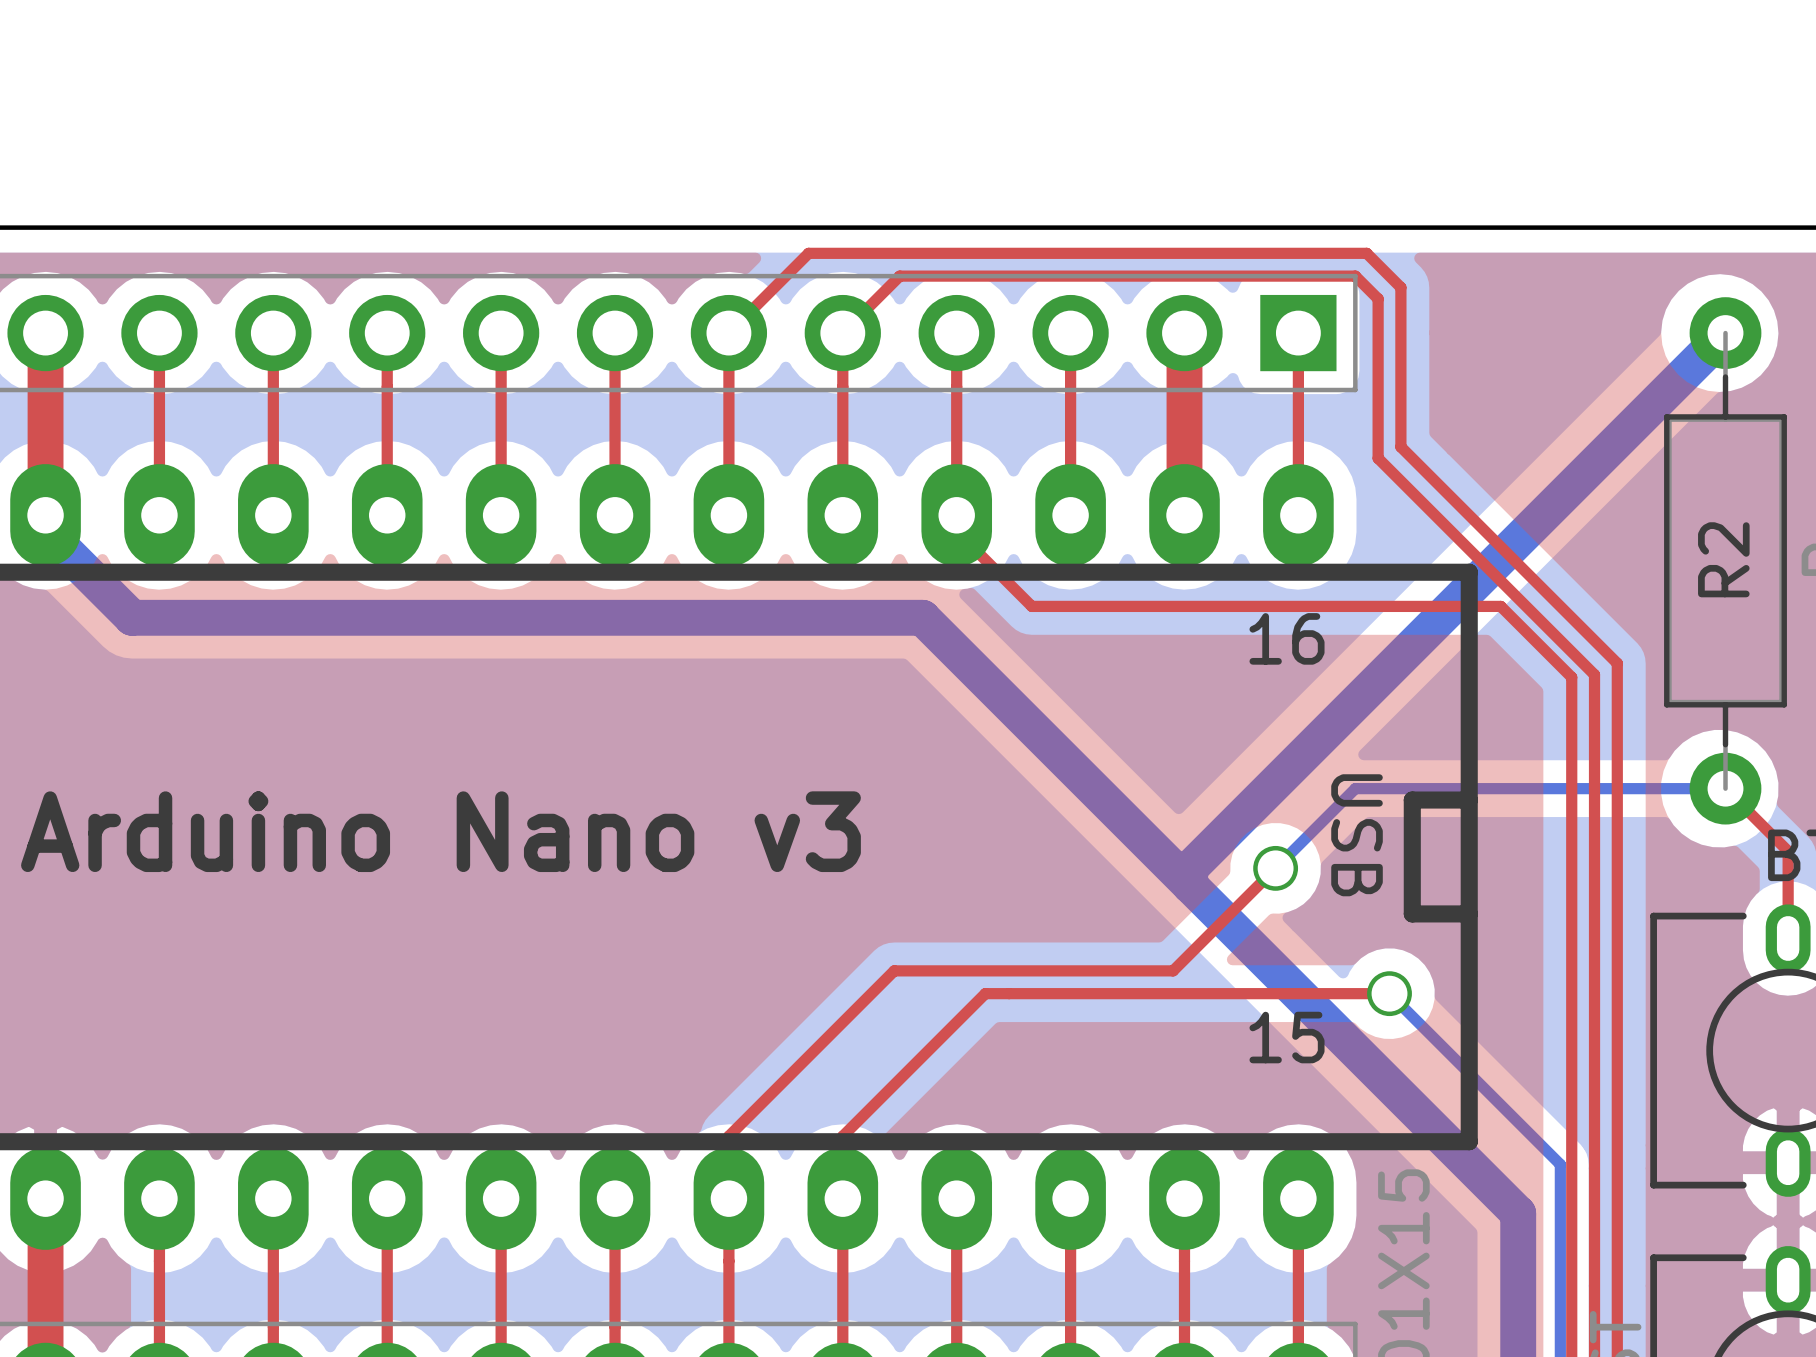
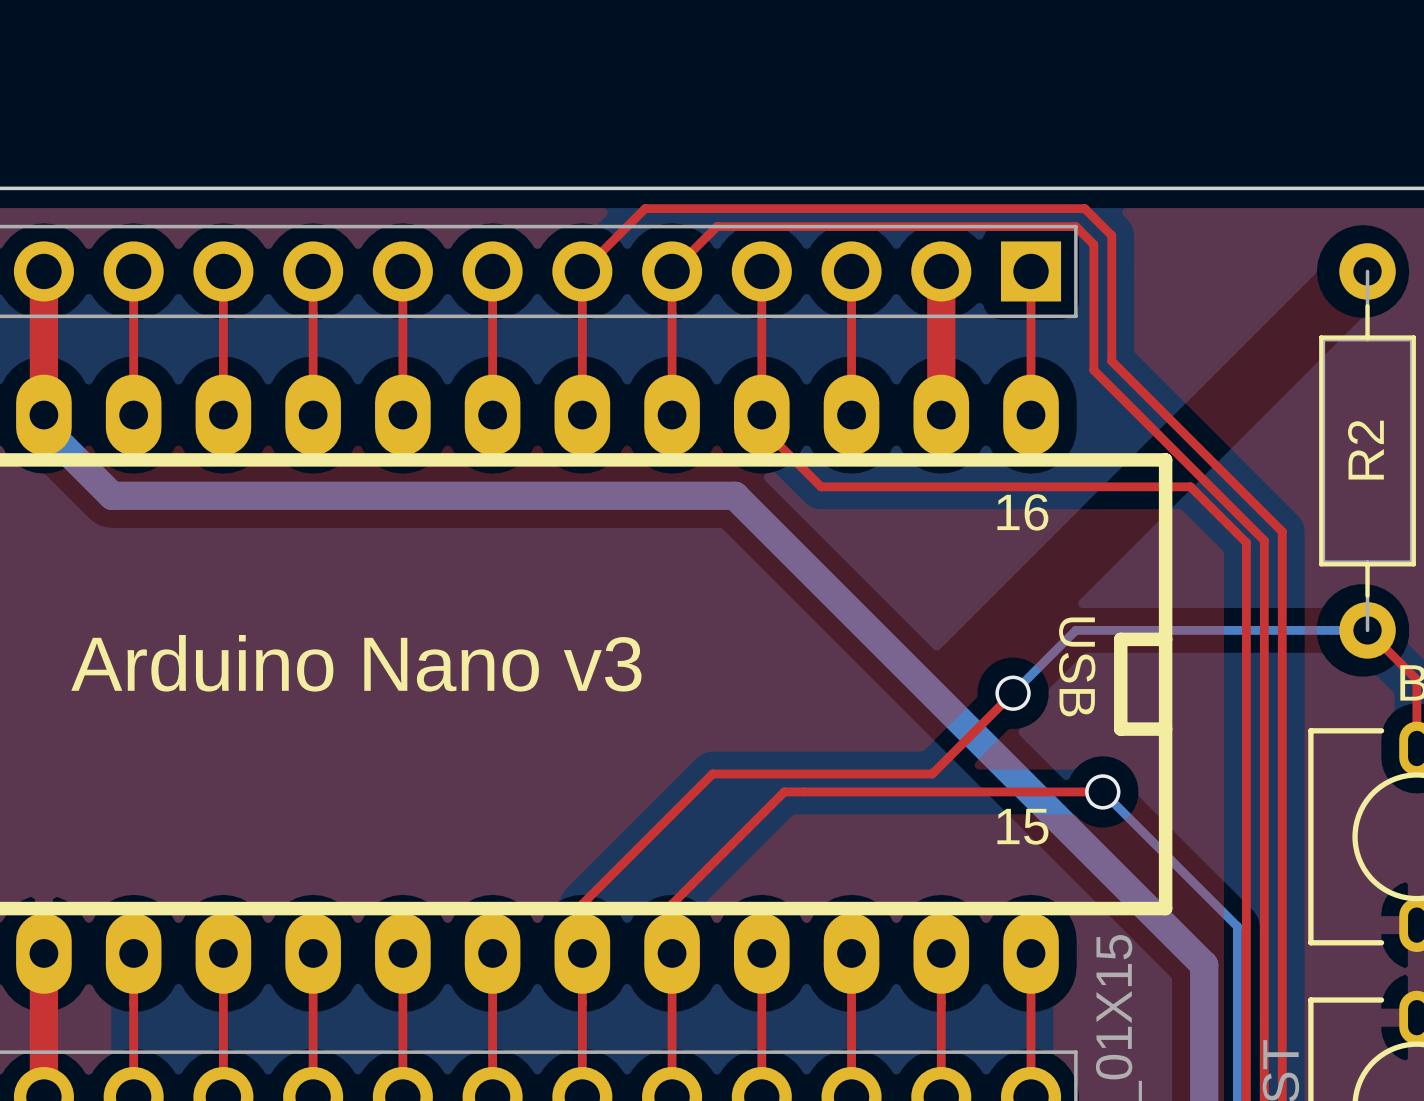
bottom track: (1725, 333) (1190, 868) (1190, 885) -> none

